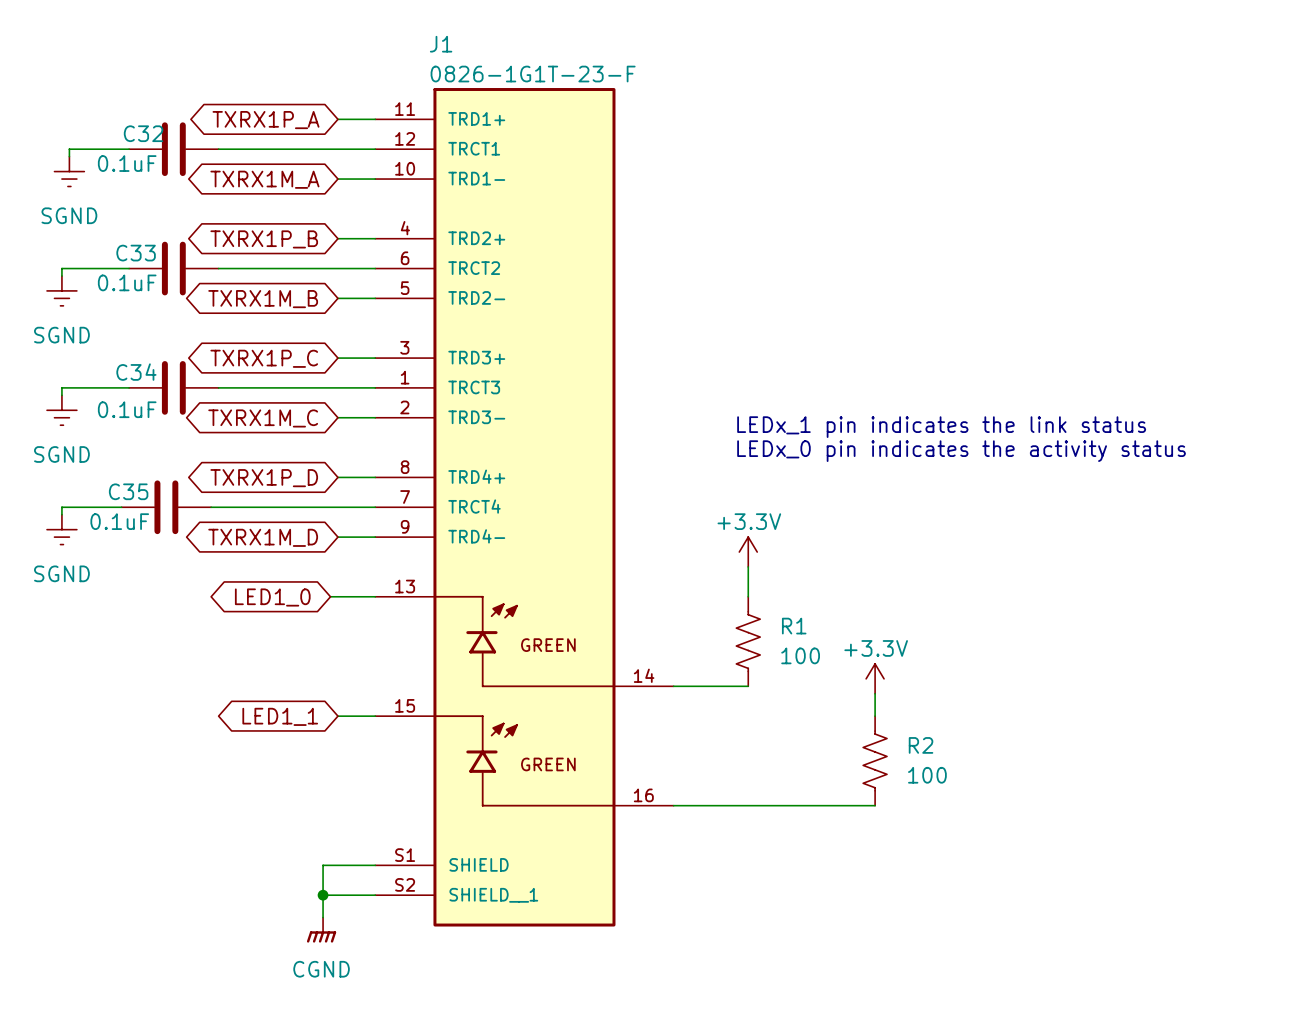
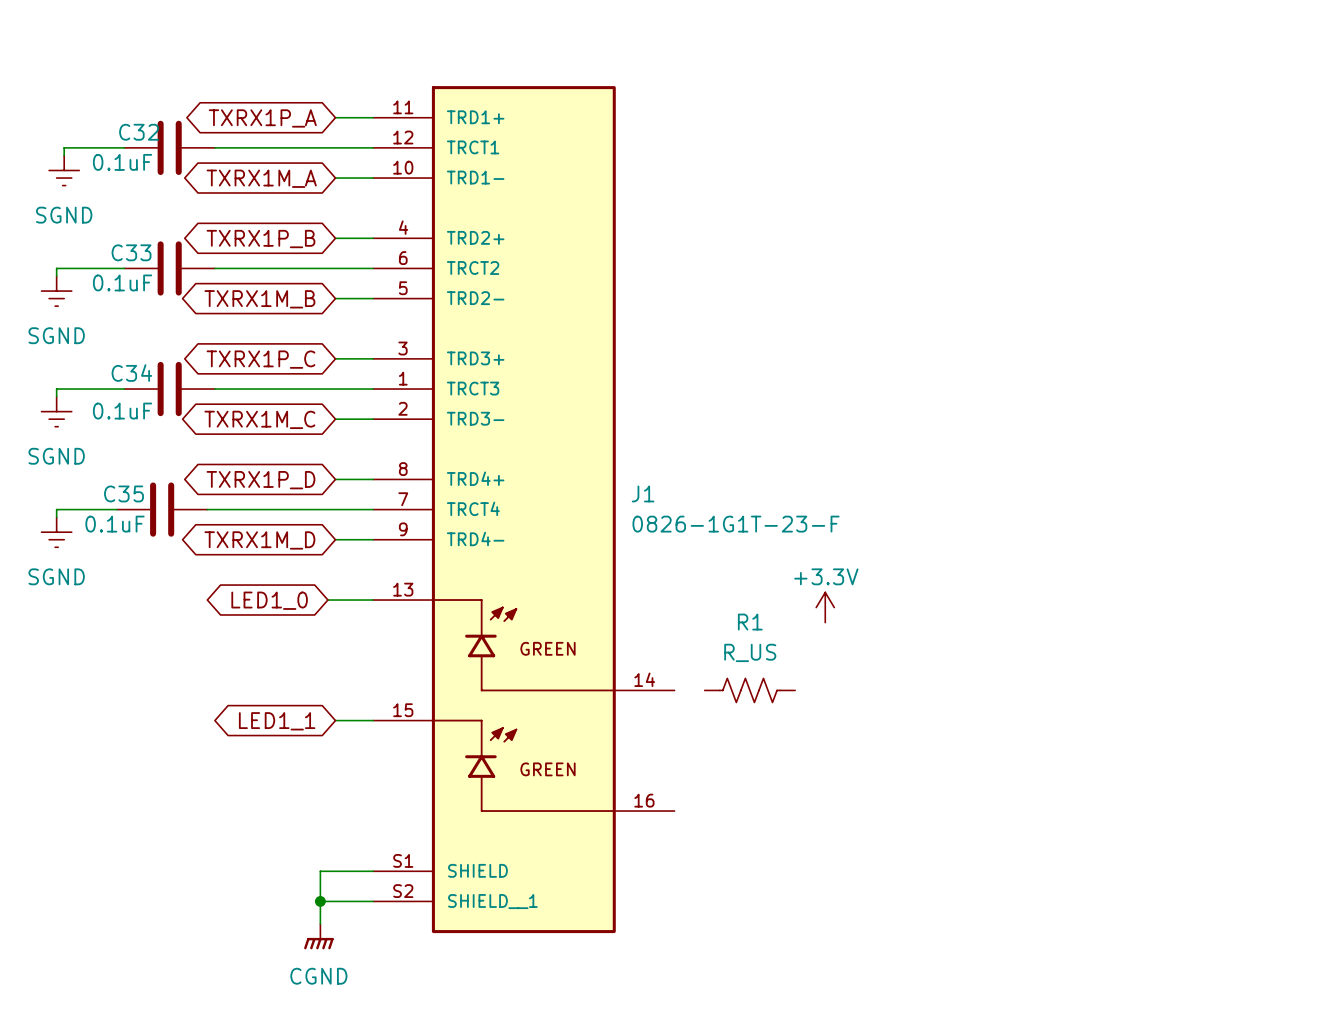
J1 name position: J1 (441, 44) -> J1 (643, 493)
J1 value position: 0826-1G1T-23-F (533, 74) -> 0826-1G1T-23-F (736, 524)
text: LEDx_1 pin indicates the link status (941, 427) -> none
text: LEDx_0 pin indicates the activity status (961, 451) -> none
power symbol: +3.3V (748, 552) -> none
wire: (748, 566) (748, 596) -> none
power symbol: none -> +3.3V (825, 607)
R1 name position: R1 (794, 626) -> R1 (750, 622)
R1 rotation: 0° (748, 641) -> 90° clockwise (749, 690)
R1 value: 100 (800, 655) -> R_US (750, 652)
power symbol: +3.3V (875, 678) -> none
wire: (673, 686) (748, 686) -> none
wire: (875, 693) (875, 716) -> none
R2: 100 (875, 760) -> none
wire: (673, 805) (875, 805) -> none

